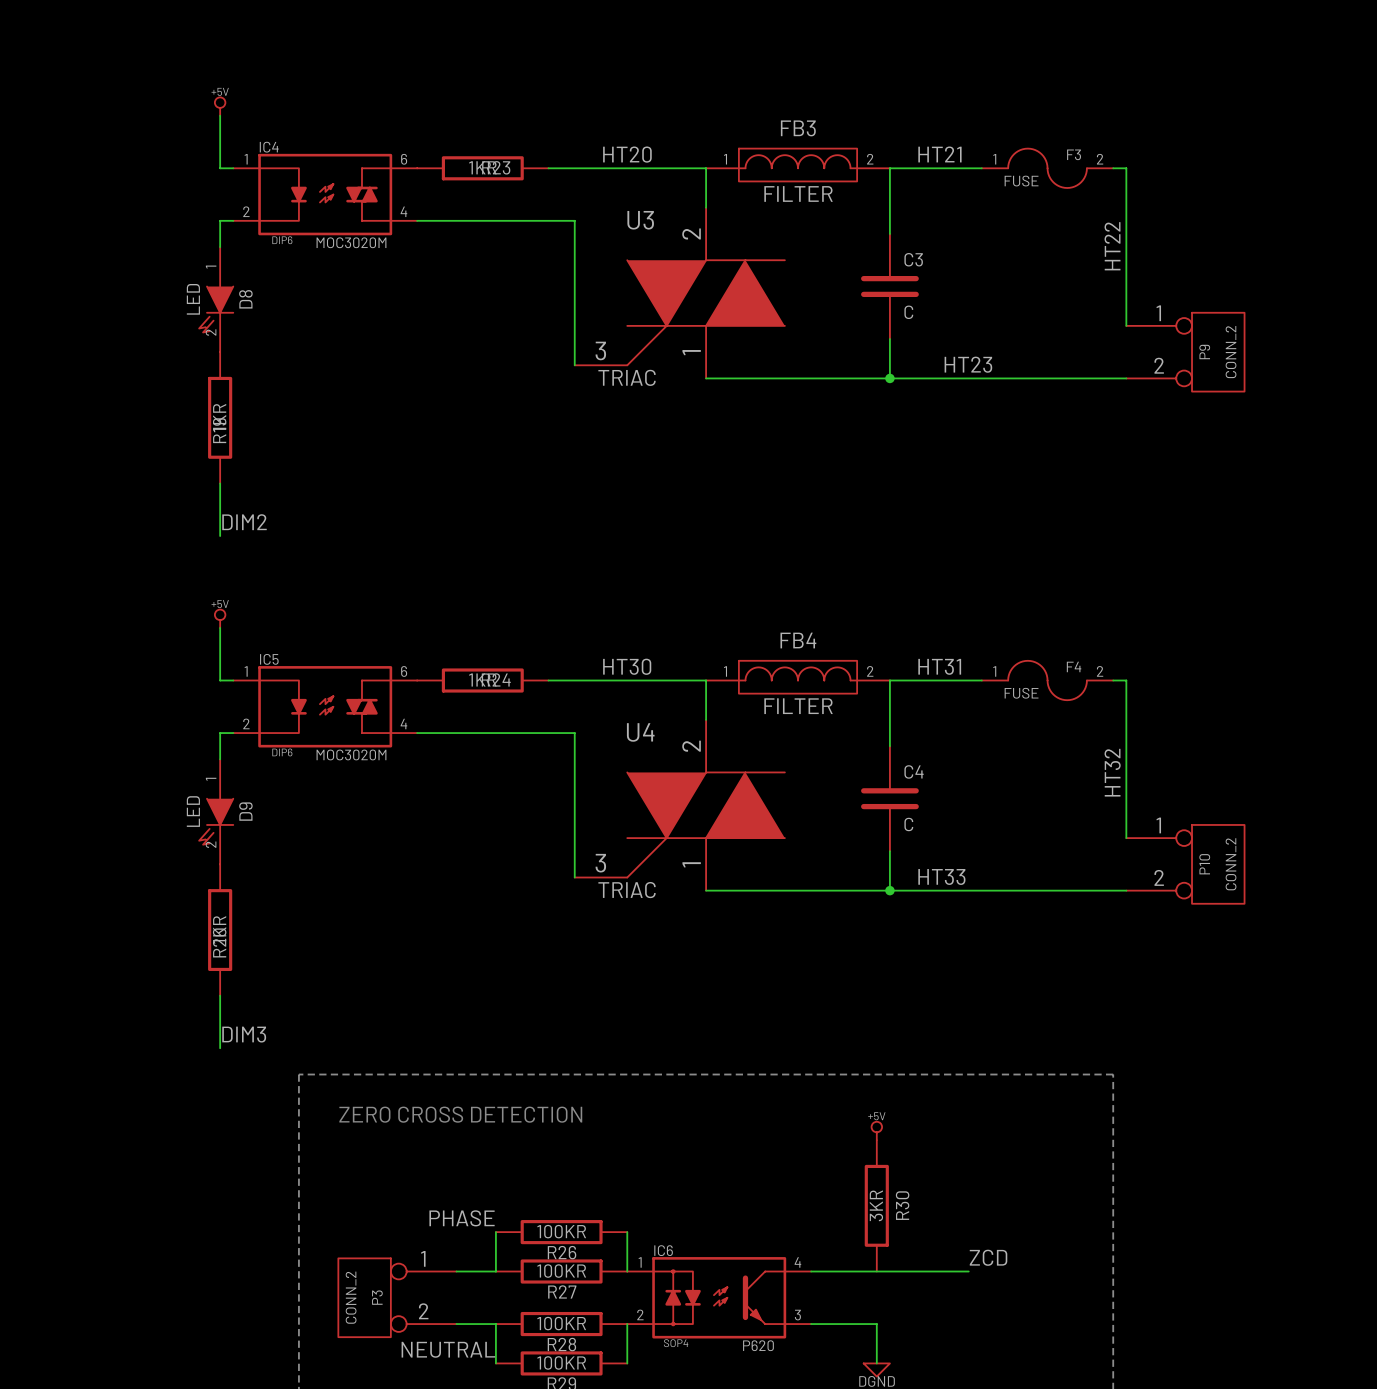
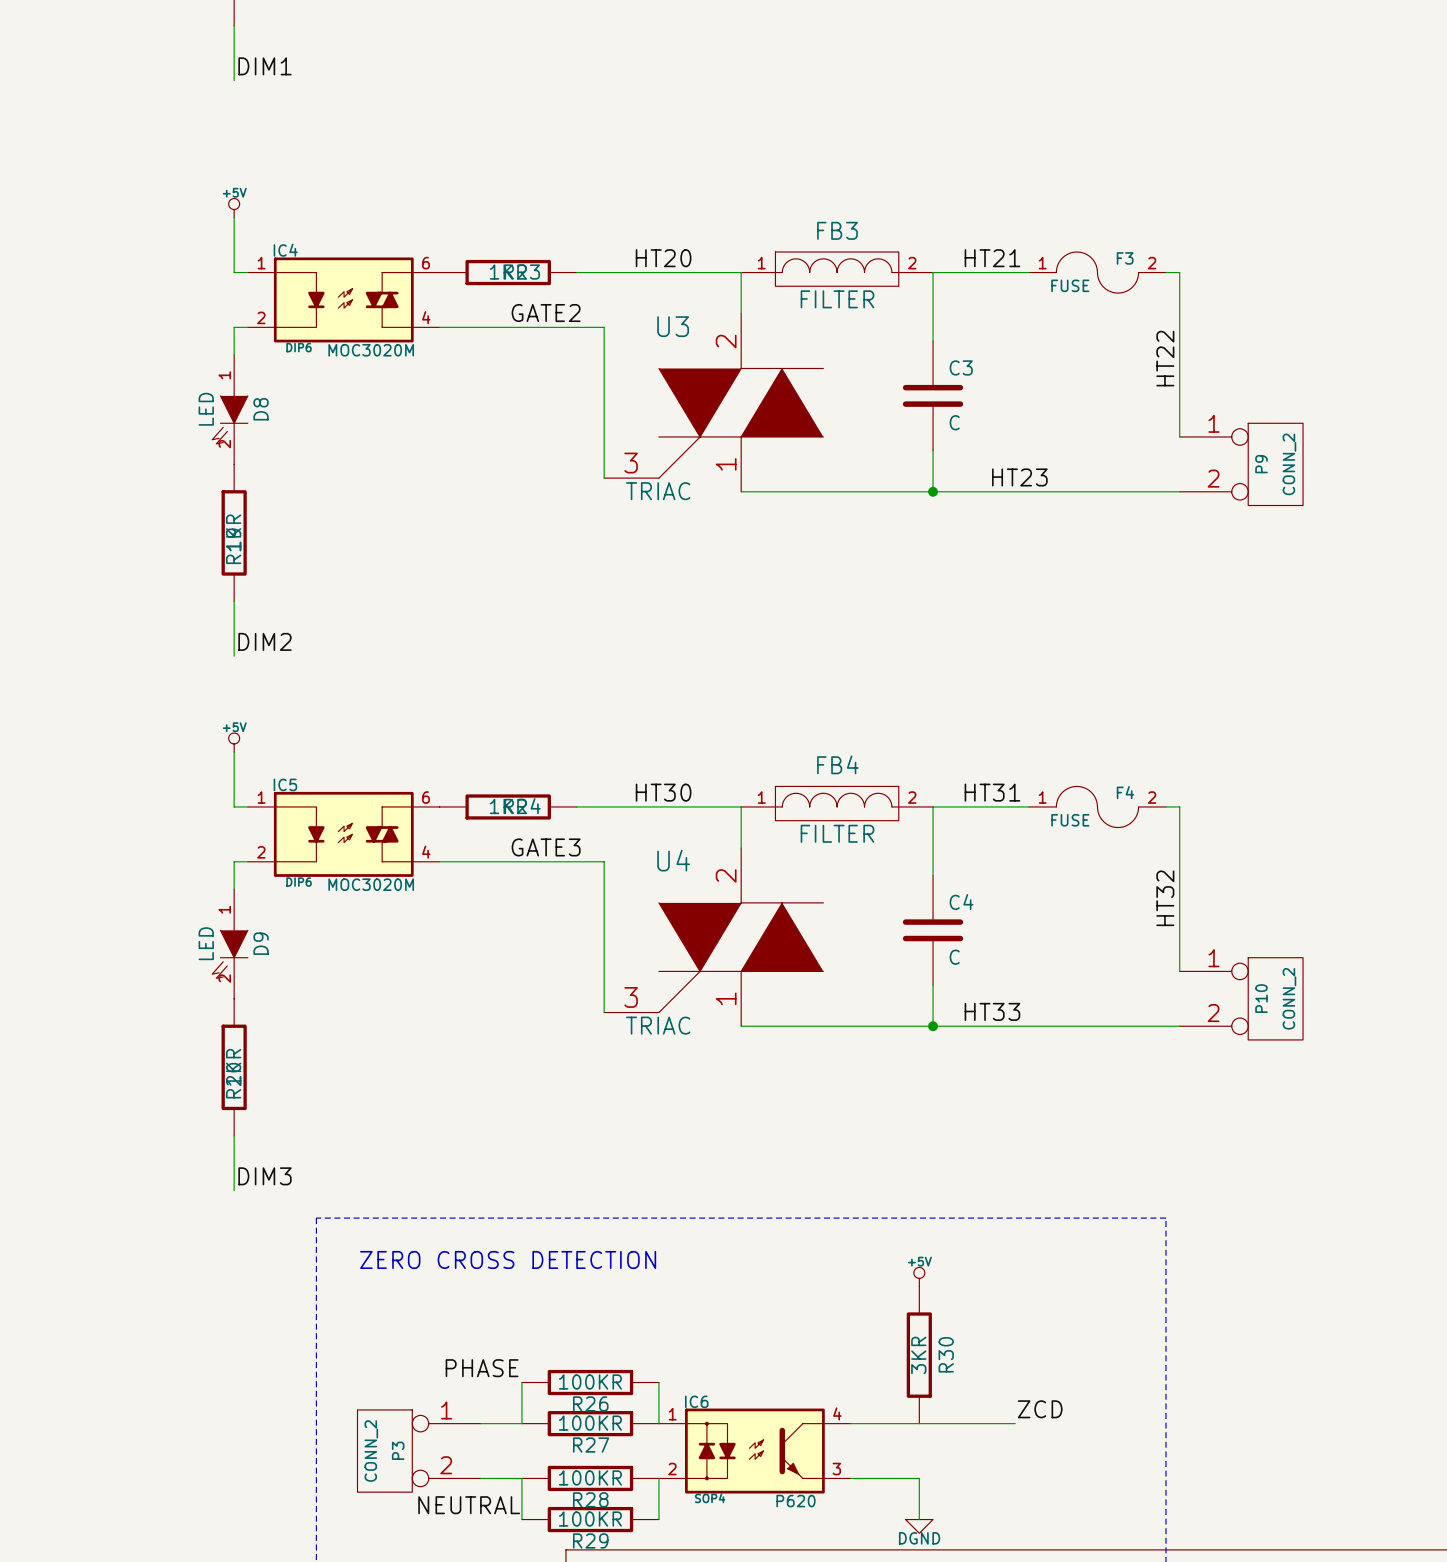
label: none -> GATE2 (546, 313)
label: none -> GATE3 (546, 847)

